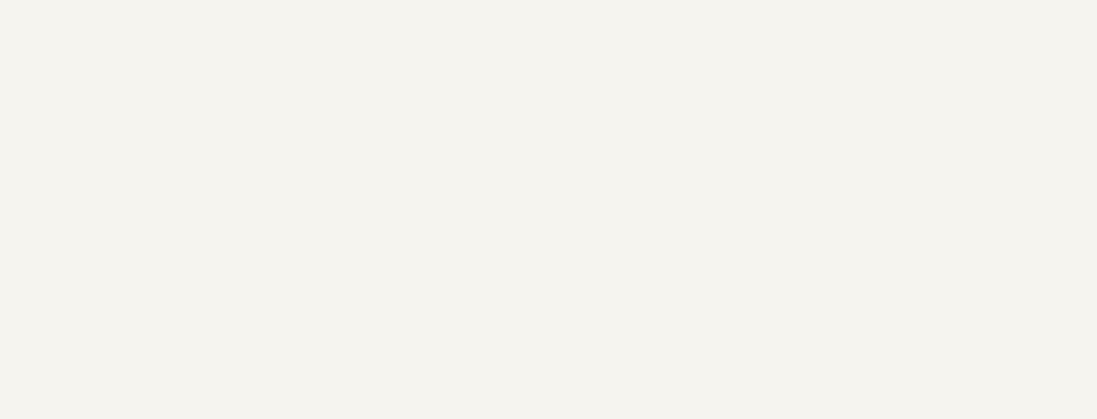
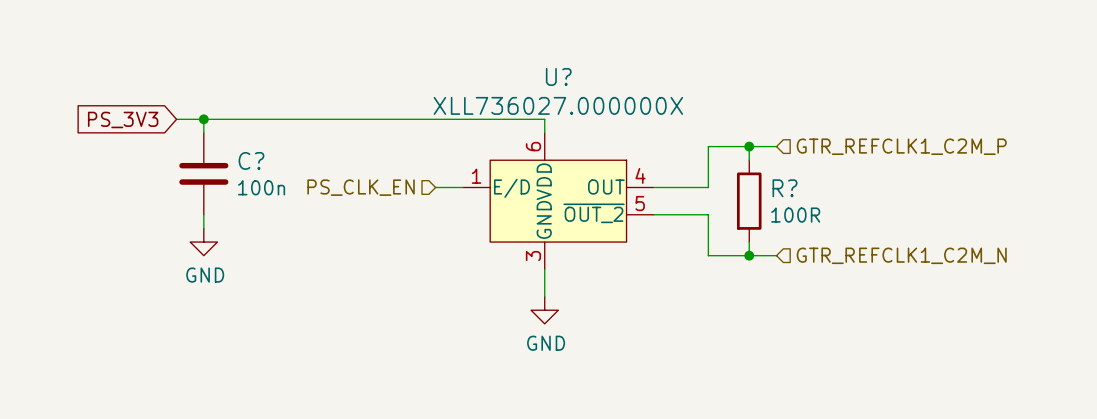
global label: none -> PS_3V3 (123, 119)
wire: none -> (176, 119) (544, 119) (544, 132)
wire: none -> (203, 119) (203, 132)
junction: none -> (203, 119)
wire: none -> (749, 146) (749, 160)
junction: none -> (749, 146)
wire: none -> (776, 146) (708, 146) (708, 187) (653, 187)
hierarchical label: none -> GTR_REFCLK1_C2M_P (901, 146)
C?: none -> (203, 173)
hierarchical label: none -> PS_CLK_EN (361, 187)
wire: none -> (435, 187) (462, 187)
U?: none -> XLL736027.000000X (558, 201)
R?: none -> (749, 201)
wire: none -> (203, 214) (203, 228)
wire: none -> (653, 214) (708, 214) (708, 255) (776, 255)
power symbol: none -> GND (203, 242)
wire: none -> (749, 242) (749, 255)
junction: none -> (749, 255)
hierarchical label: none -> GTR_REFCLK1_C2M_N (901, 255)
wire: none -> (544, 269) (544, 296)
power symbol: none -> GND (544, 310)

